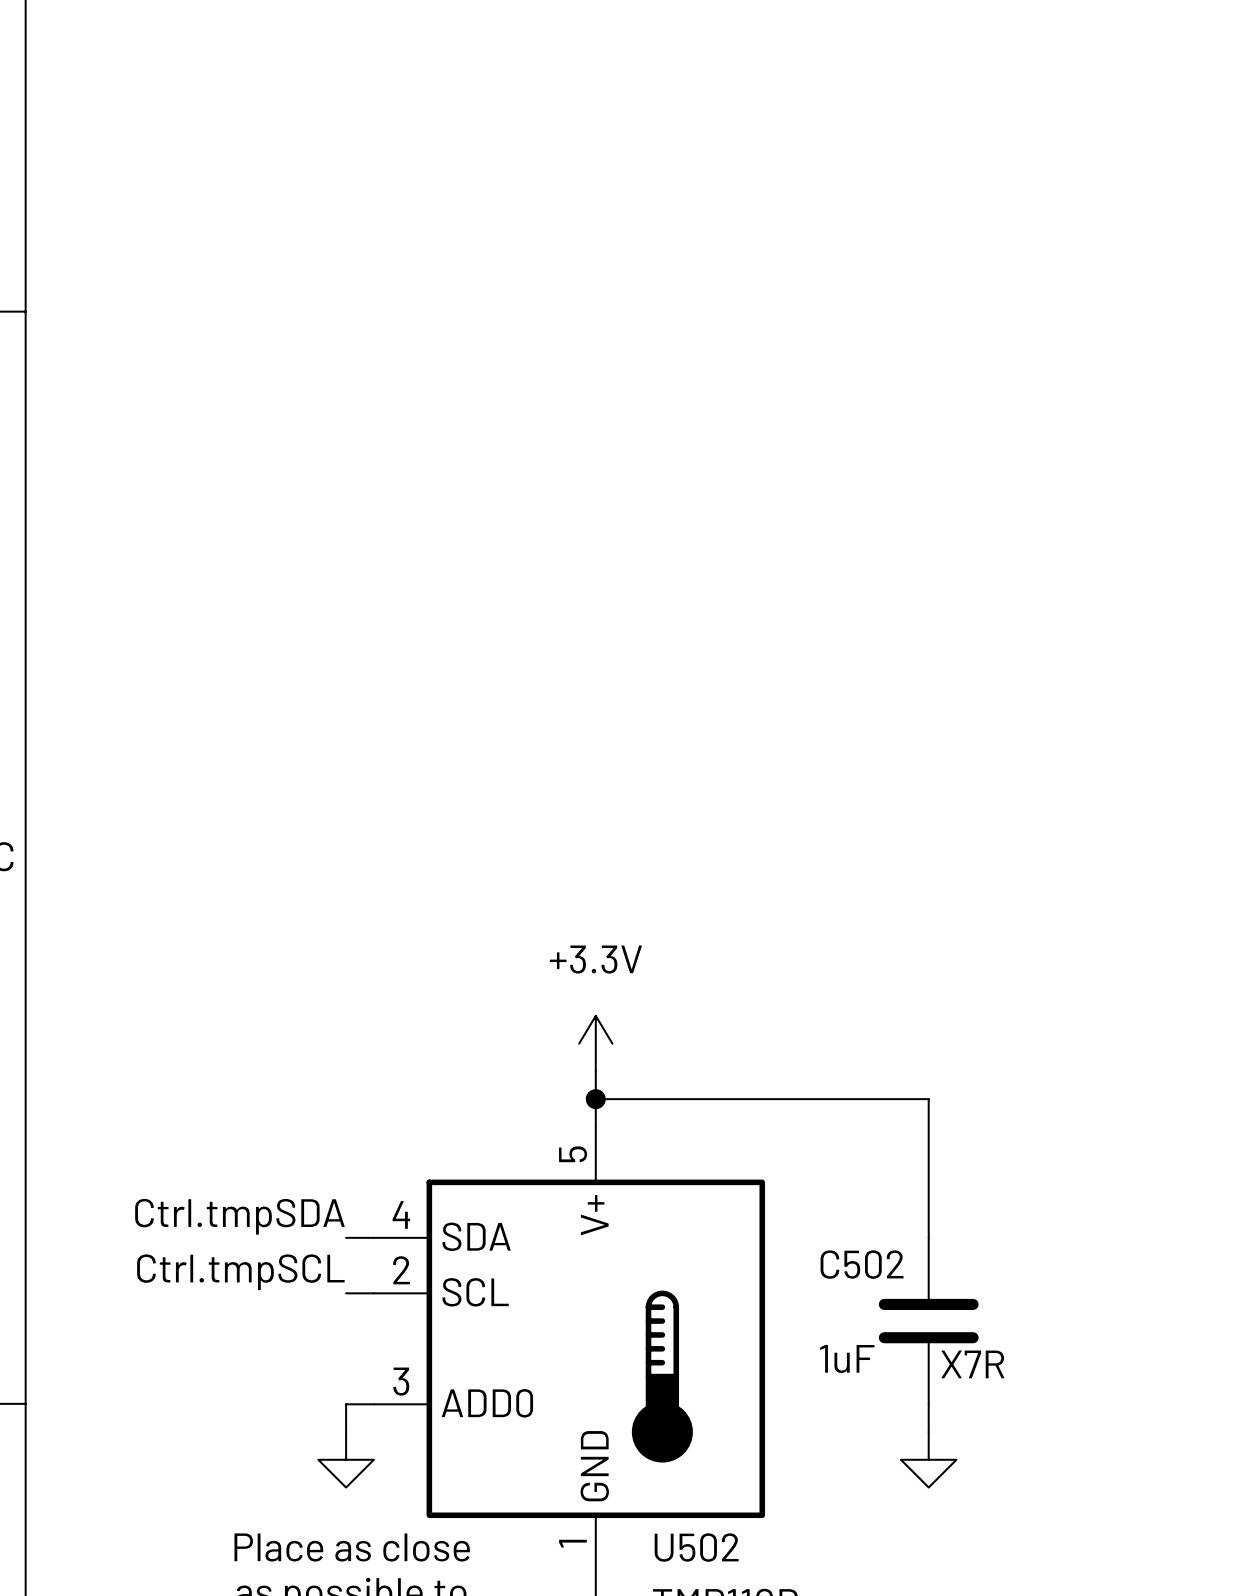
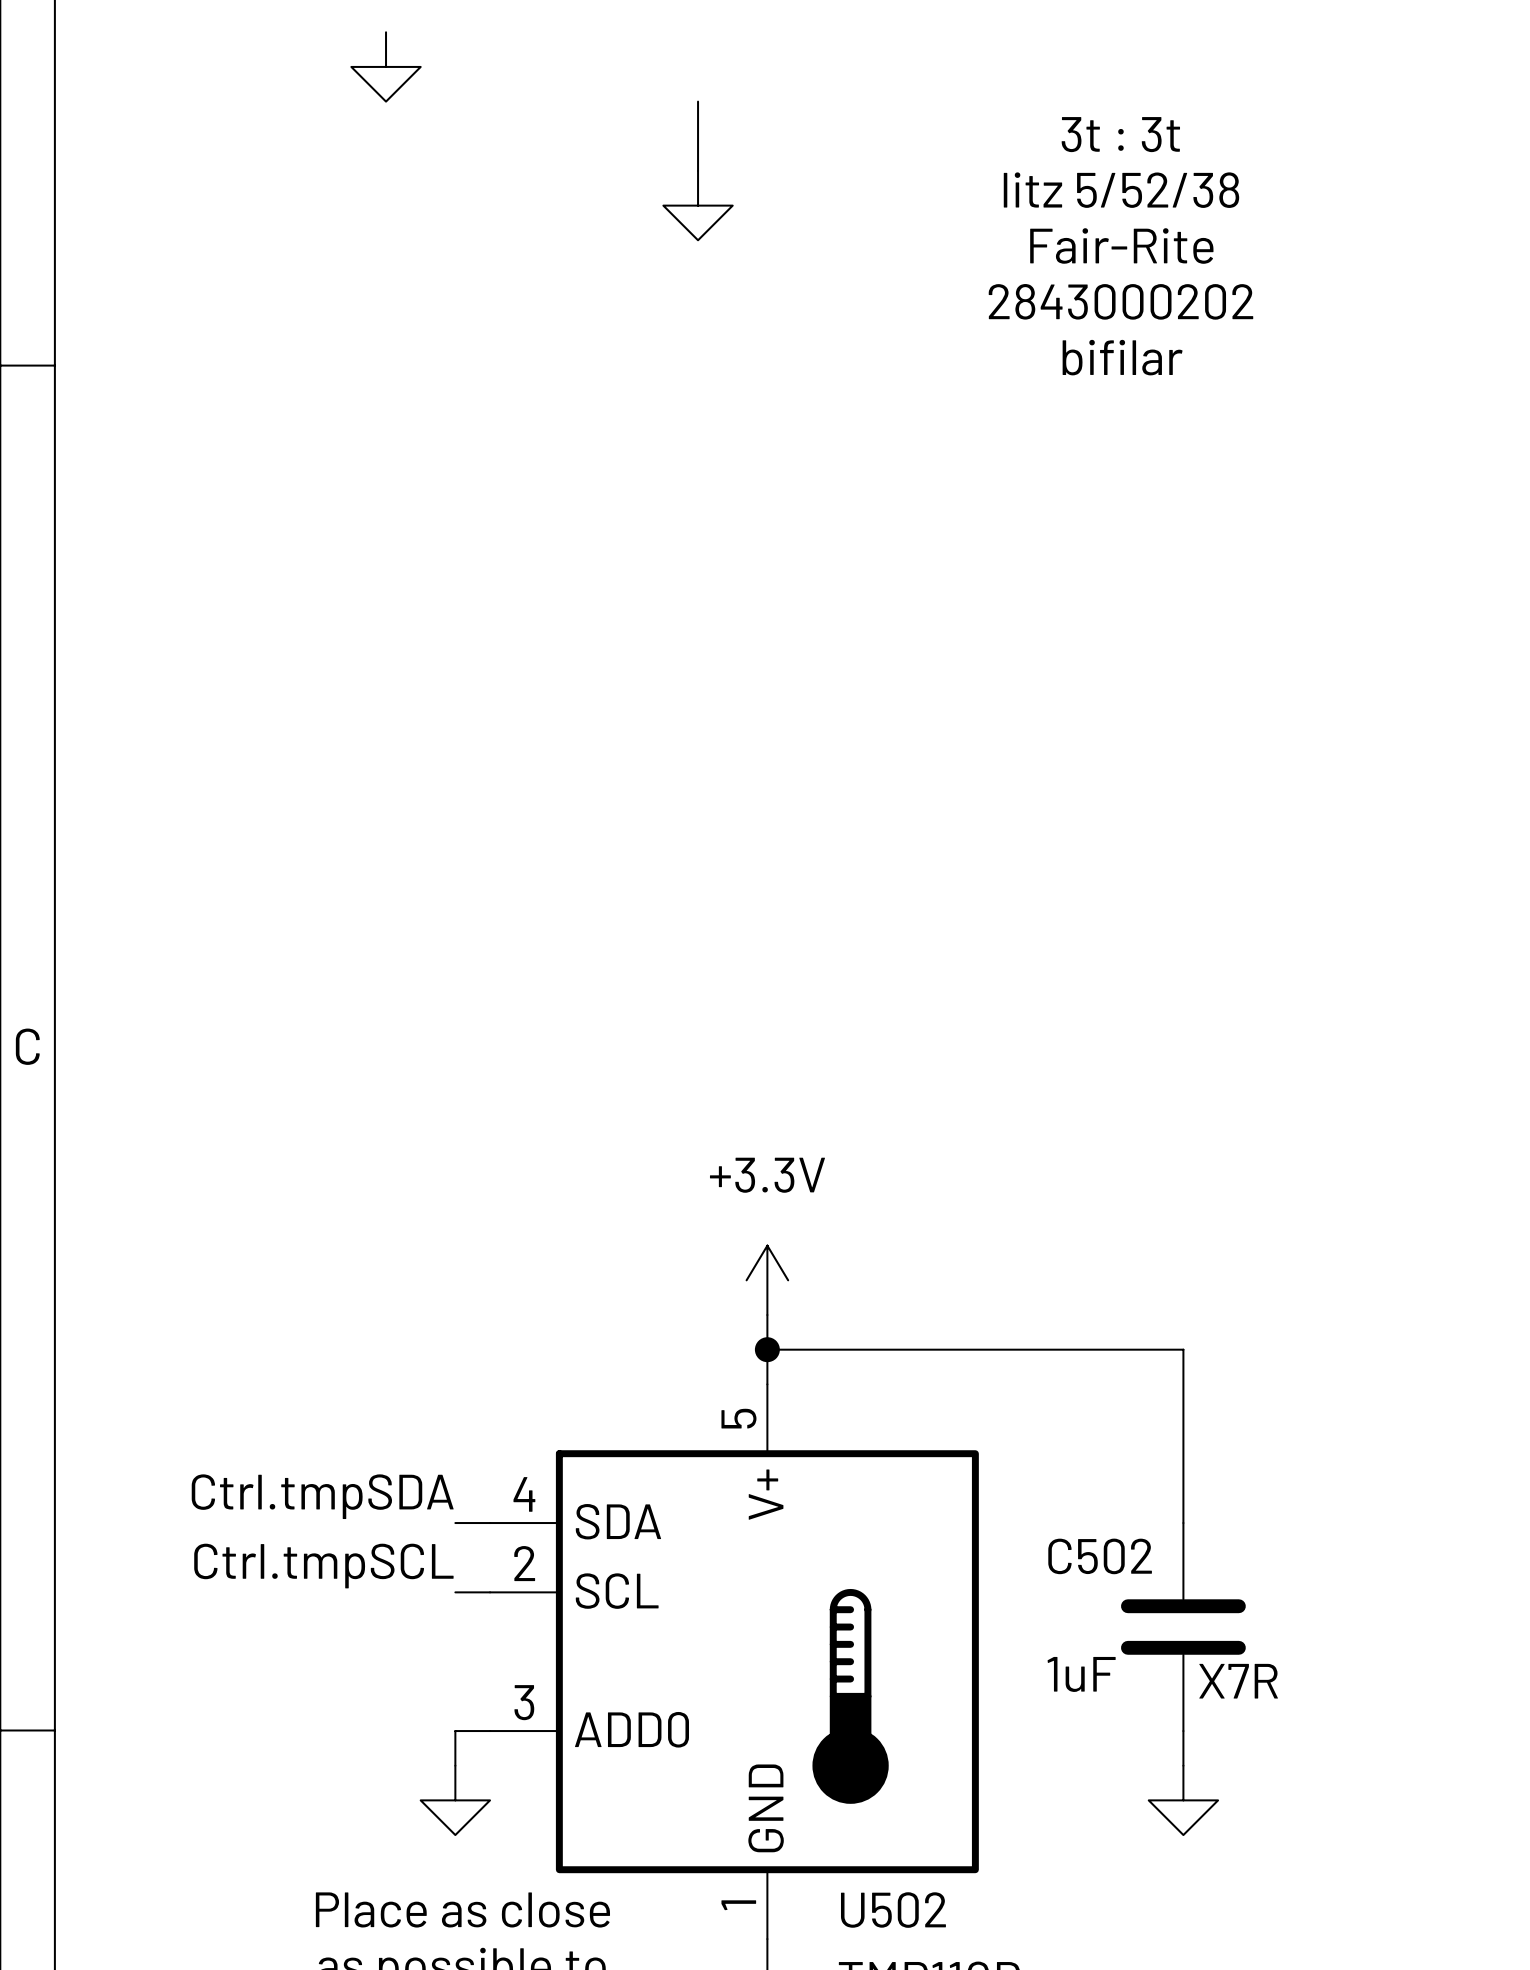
power symbol: none -> (386, 66)
wire: none -> (698, 101) (698, 170)
text: none -> 3t : 3t (1120, 134)
text: none -> litz 5/52/38 (1121, 190)
power symbol: none -> (698, 205)
text: none -> Fair-Rite (1121, 246)
text: none -> 2843000202 (1120, 301)
text: none -> bifilar (1122, 357)

